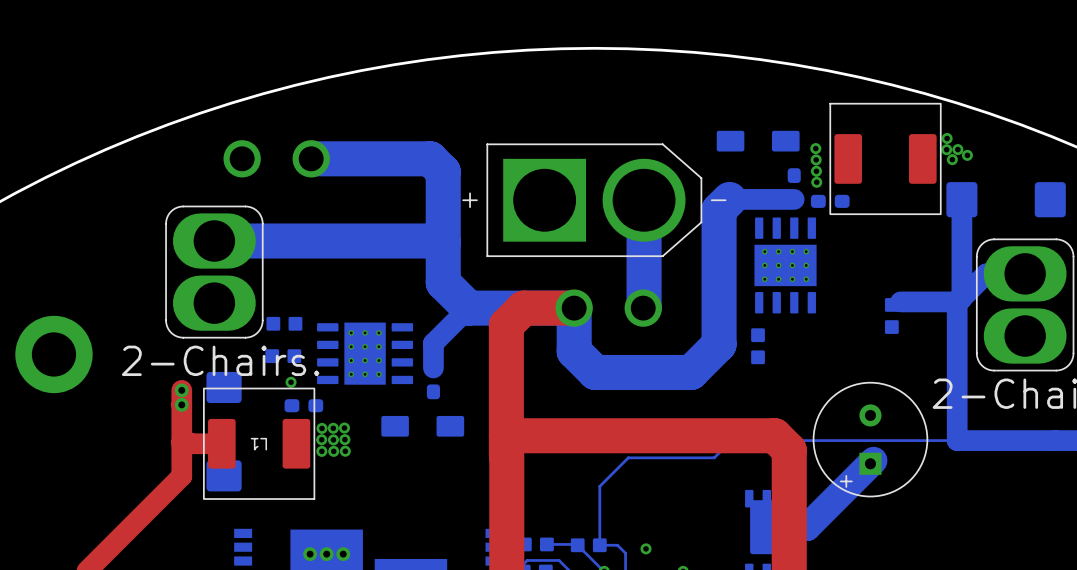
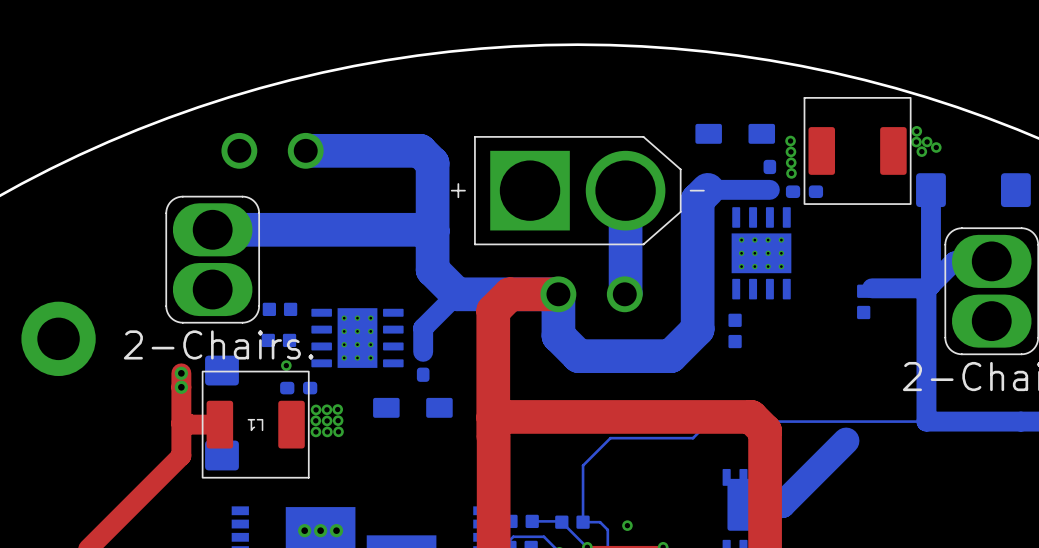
part: (870, 439) -> none

